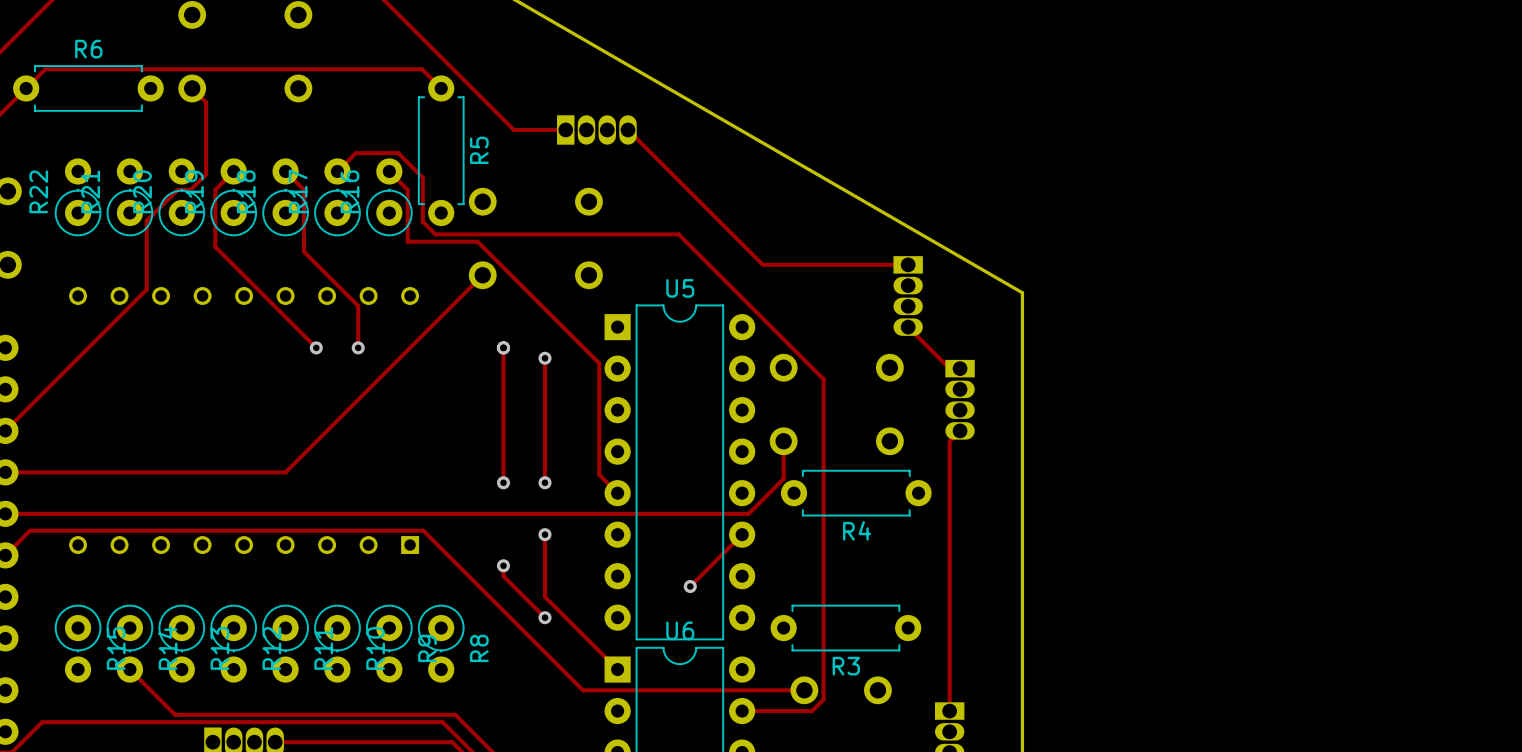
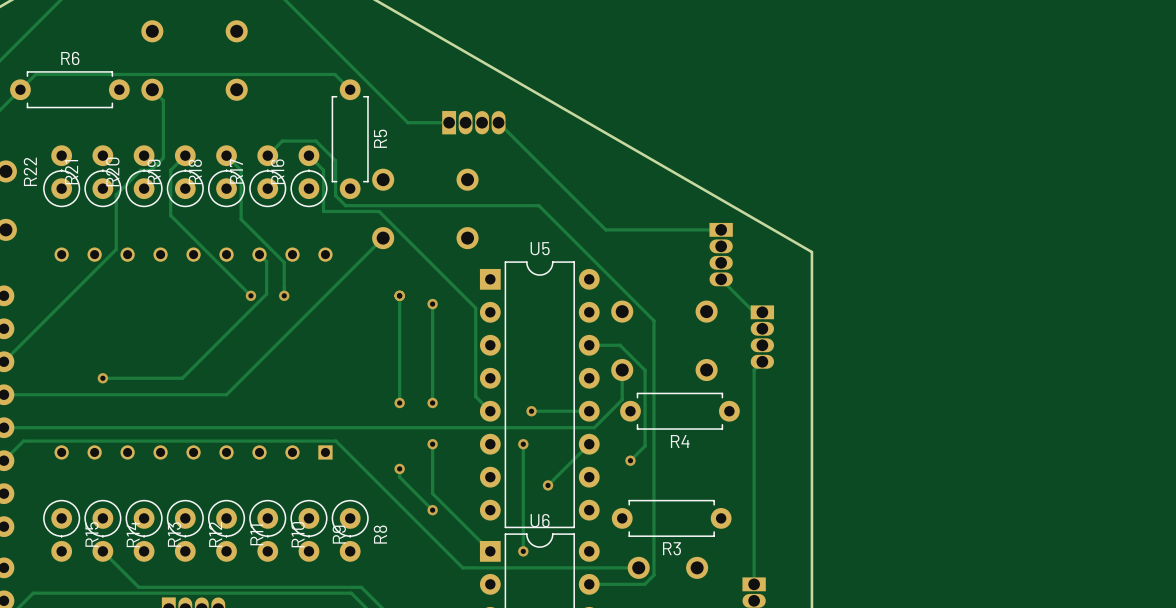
track: none -> (259, 254) (266, 261) (266, 294) (182, 378) (102, 378)
track: none -> (589, 345) (620, 345) (645, 370) (645, 446) (630, 460)
via: none -> (102, 378)
track: none -> (531, 411) (589, 411)
via: none -> (531, 411)
track: none -> (523, 444) (523, 551)
via: none -> (523, 444)
via: none -> (630, 460)
via: none -> (523, 551)

